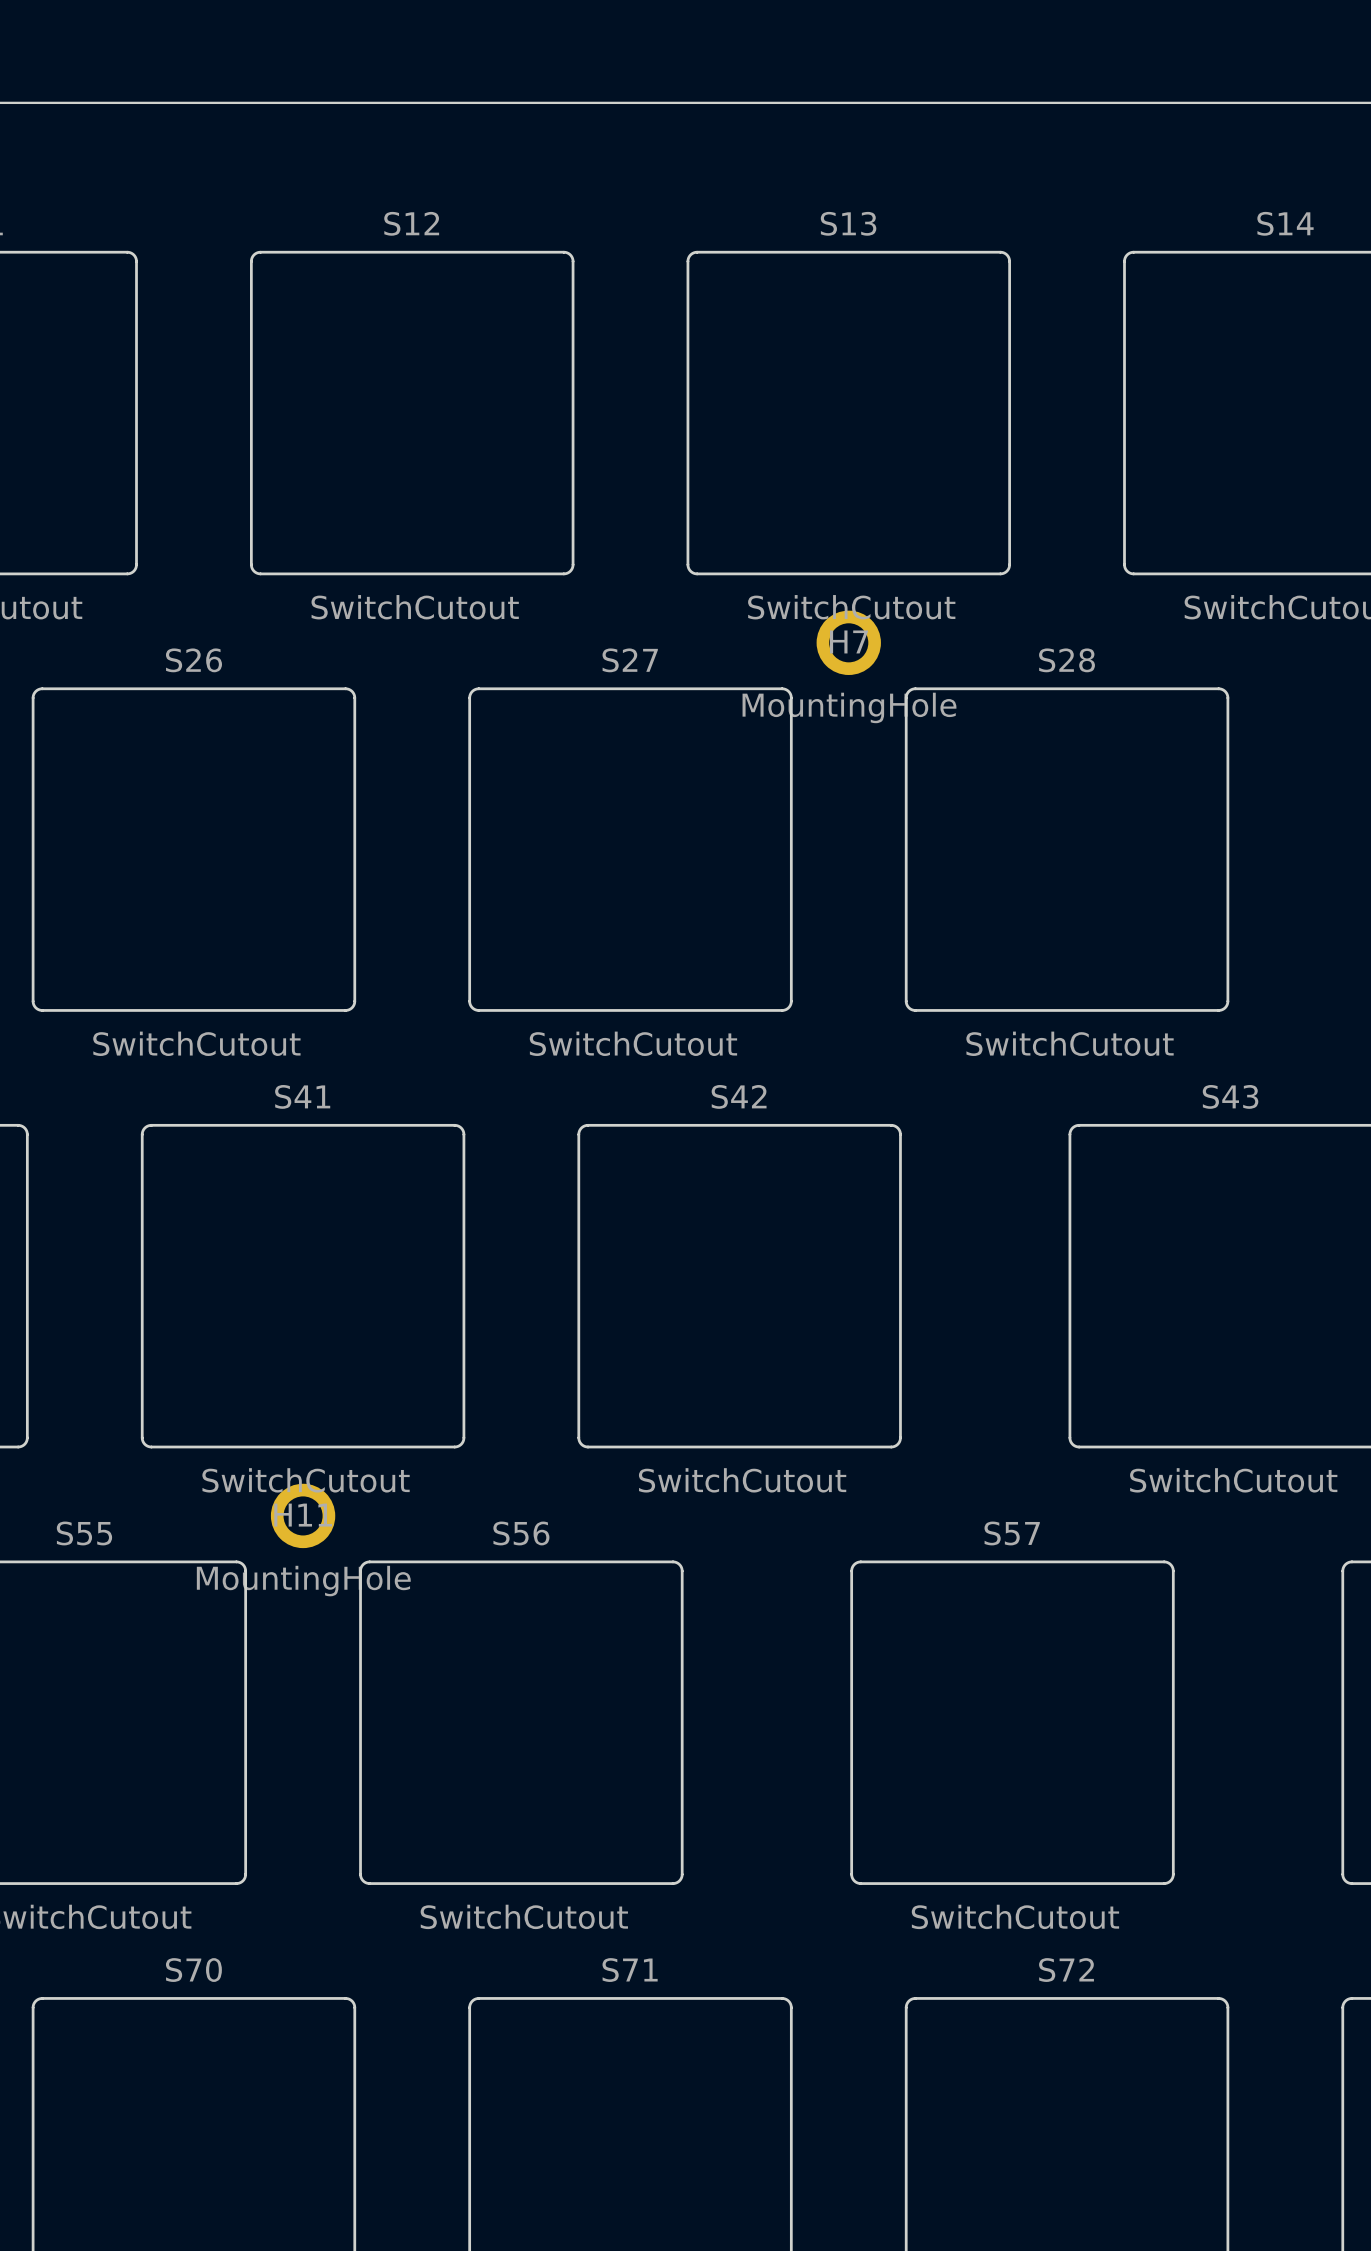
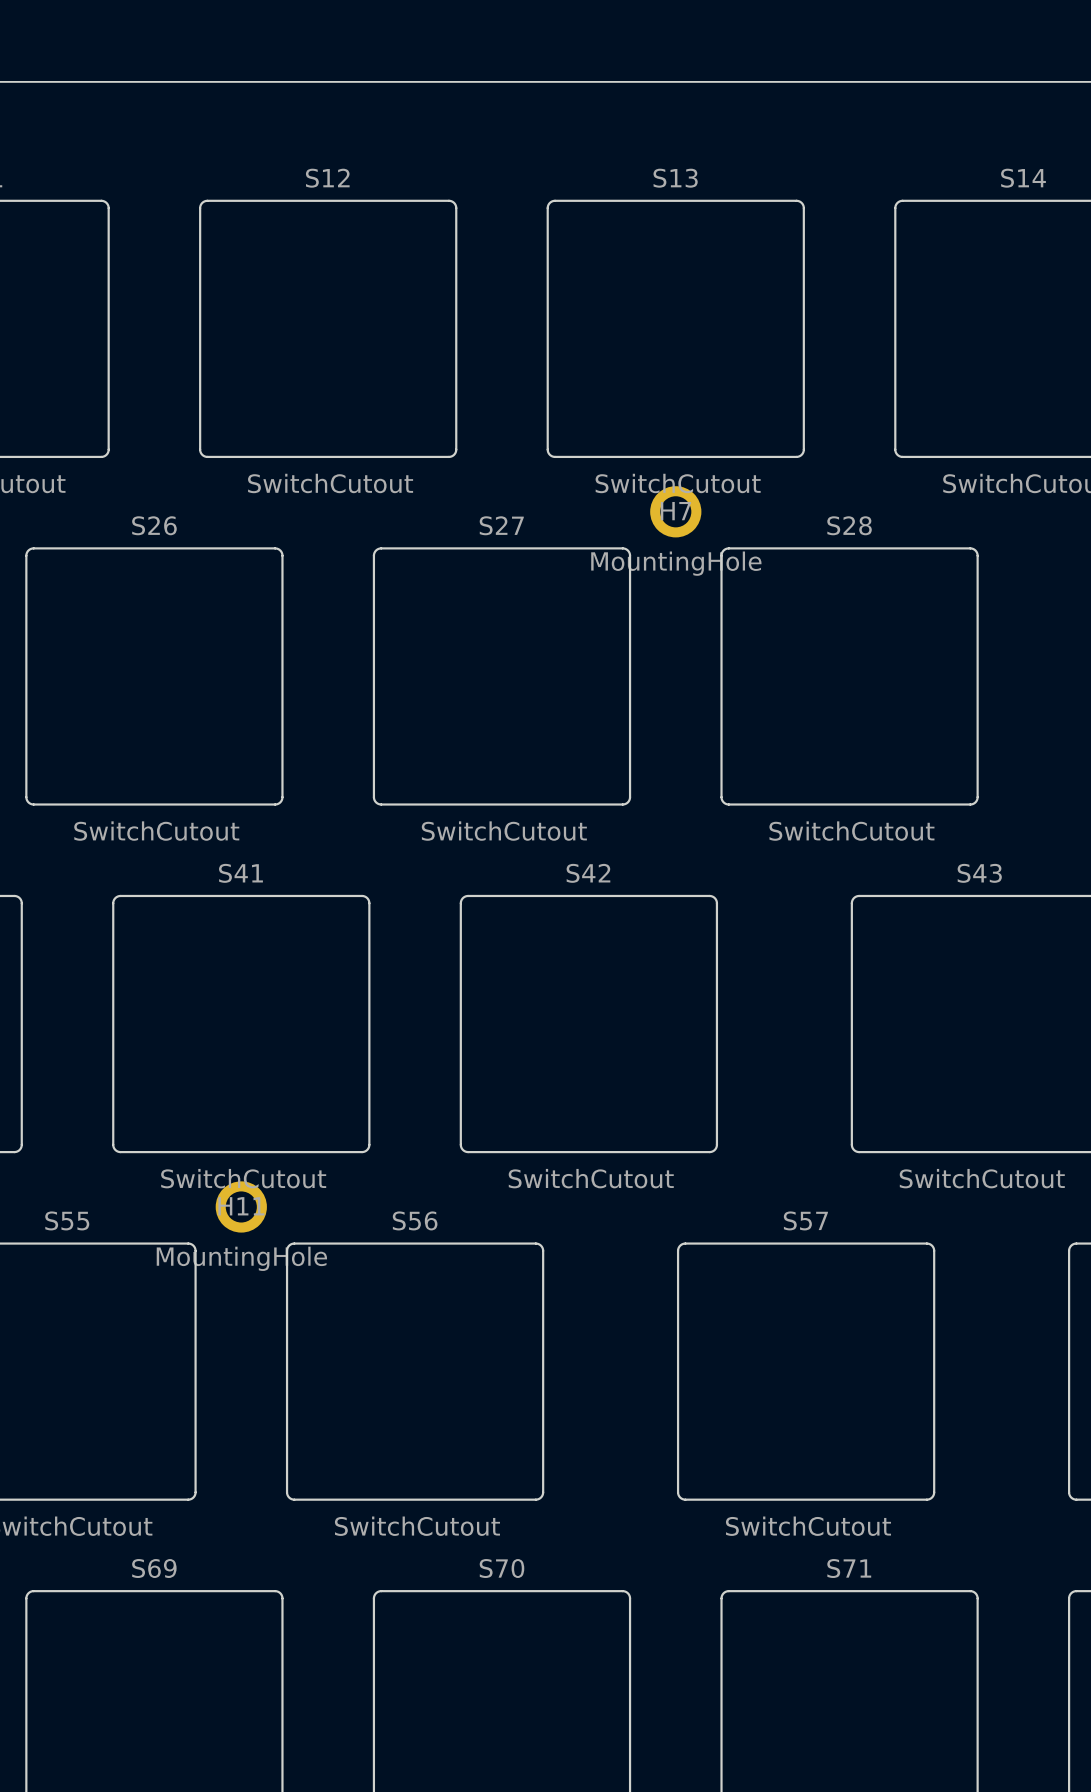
S70 name: S70 (193, 1970) -> S69 (154, 1568)
S71 name: S71 (630, 1970) -> S70 (501, 1568)
S72 name: S72 (1066, 1970) -> S71 (849, 1568)

